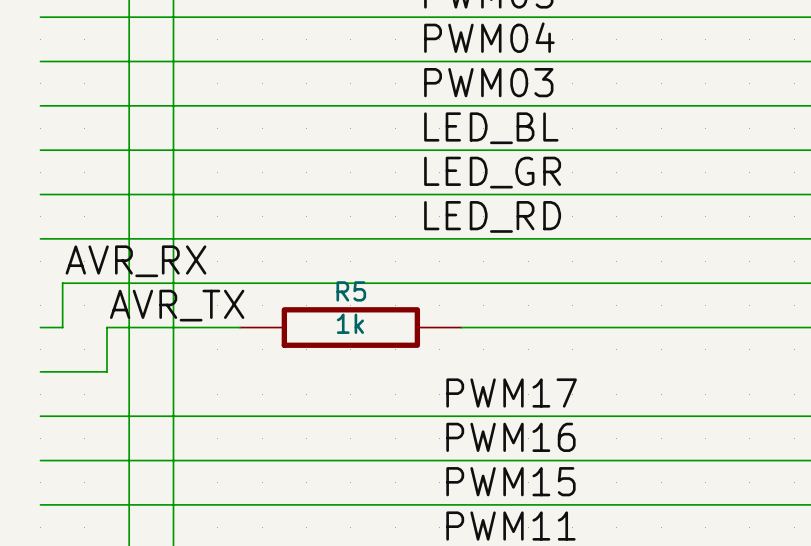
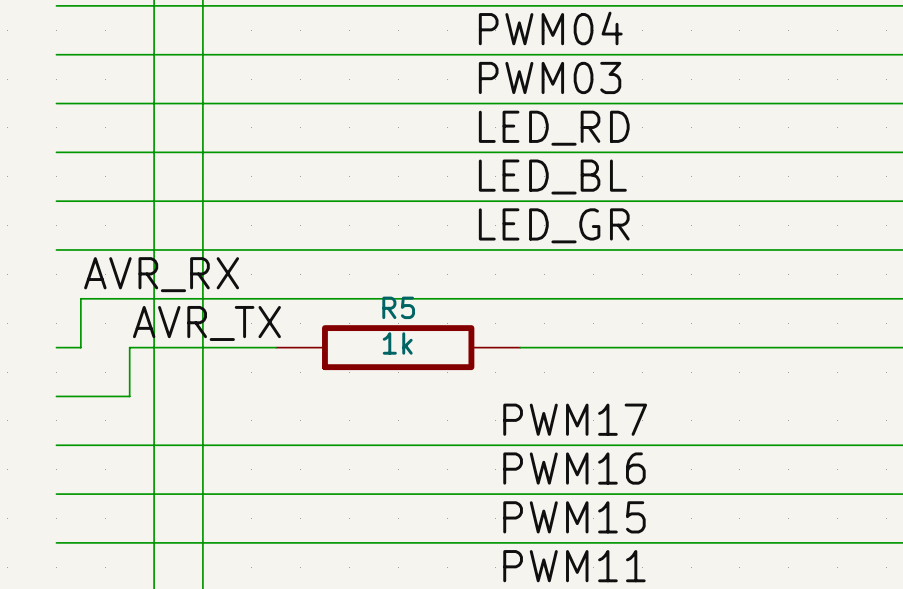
label: LED_BL (491, 128) -> LED_RD (554, 128)
label: LED_GR (492, 172) -> LED_BL (552, 177)
label: LED_RD (492, 216) -> LED_GR (554, 225)

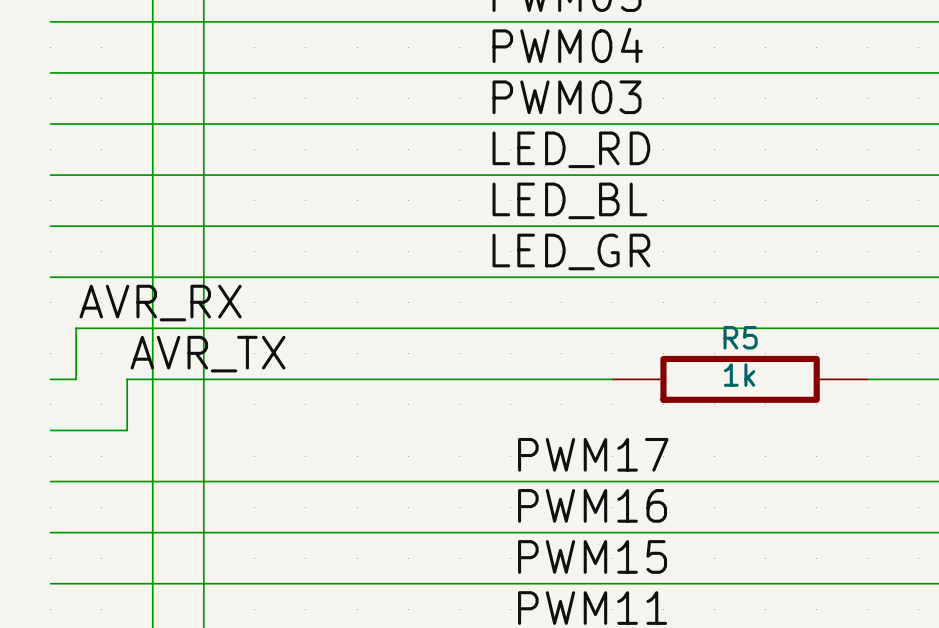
R5 position: (398, 347) -> (740, 379)
wire: (593, 347) (837, 347) -> (280, 379) (535, 379)

